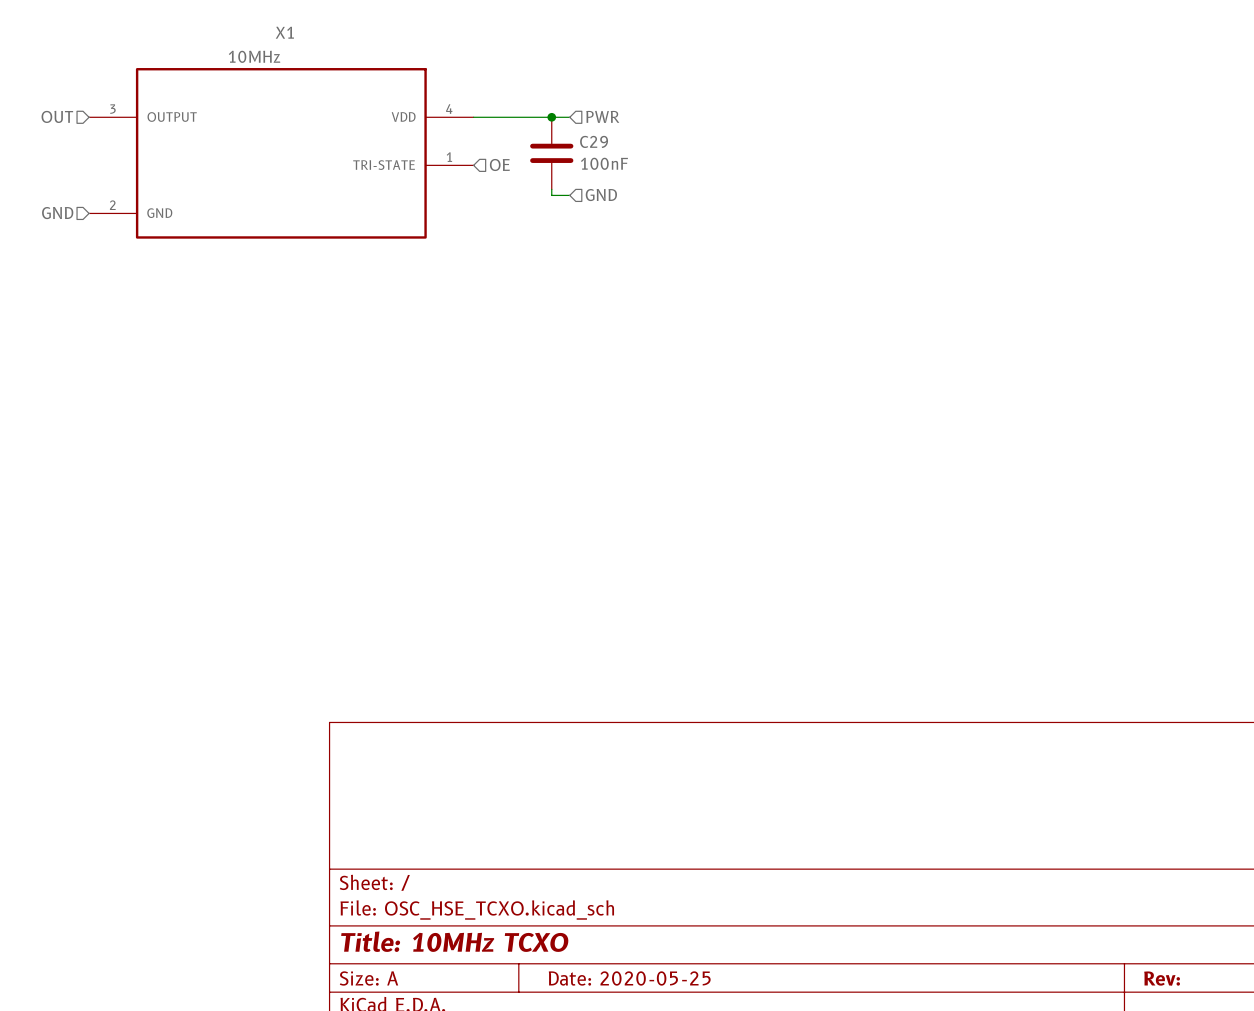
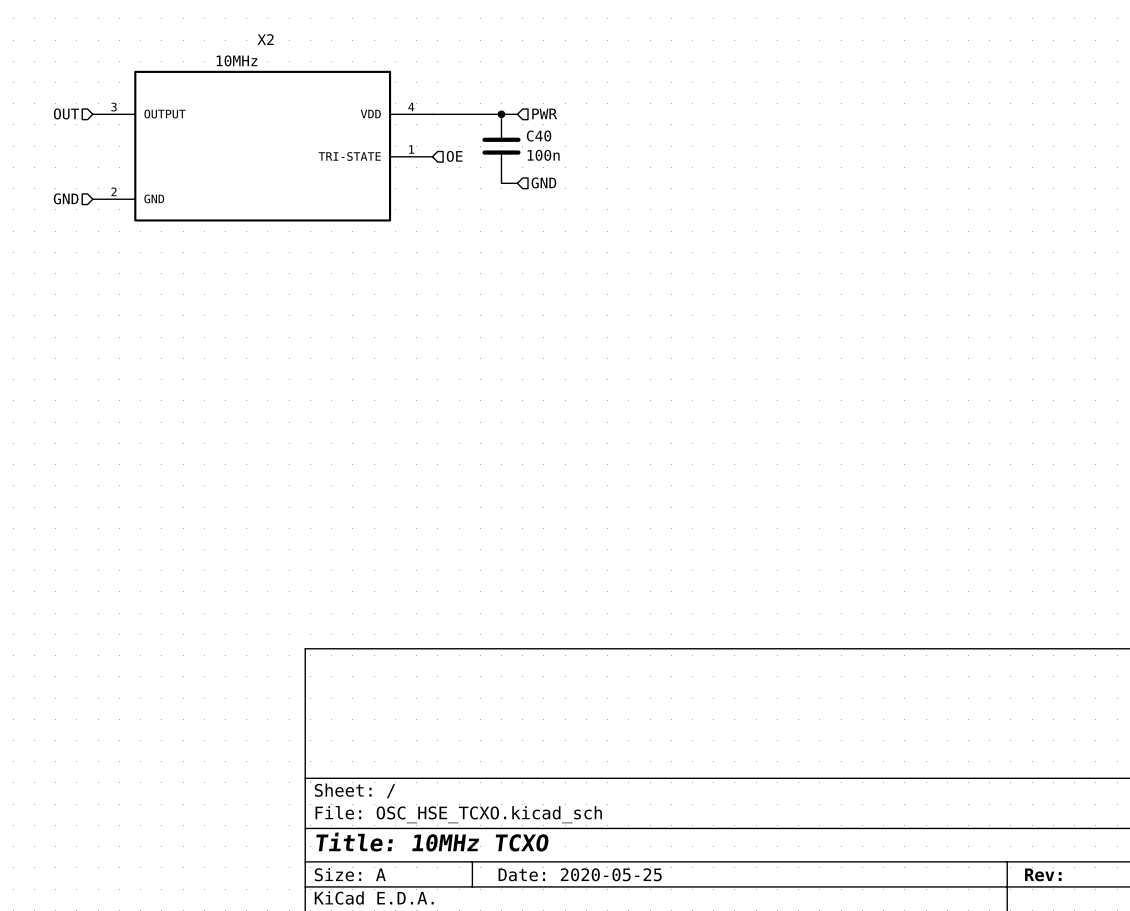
X1 name: X1 (284, 32) -> X2 (265, 39)
C29 name: C29 (594, 141) -> C40 (539, 136)
C29 value: 100nF (604, 163) -> 100n (543, 155)

